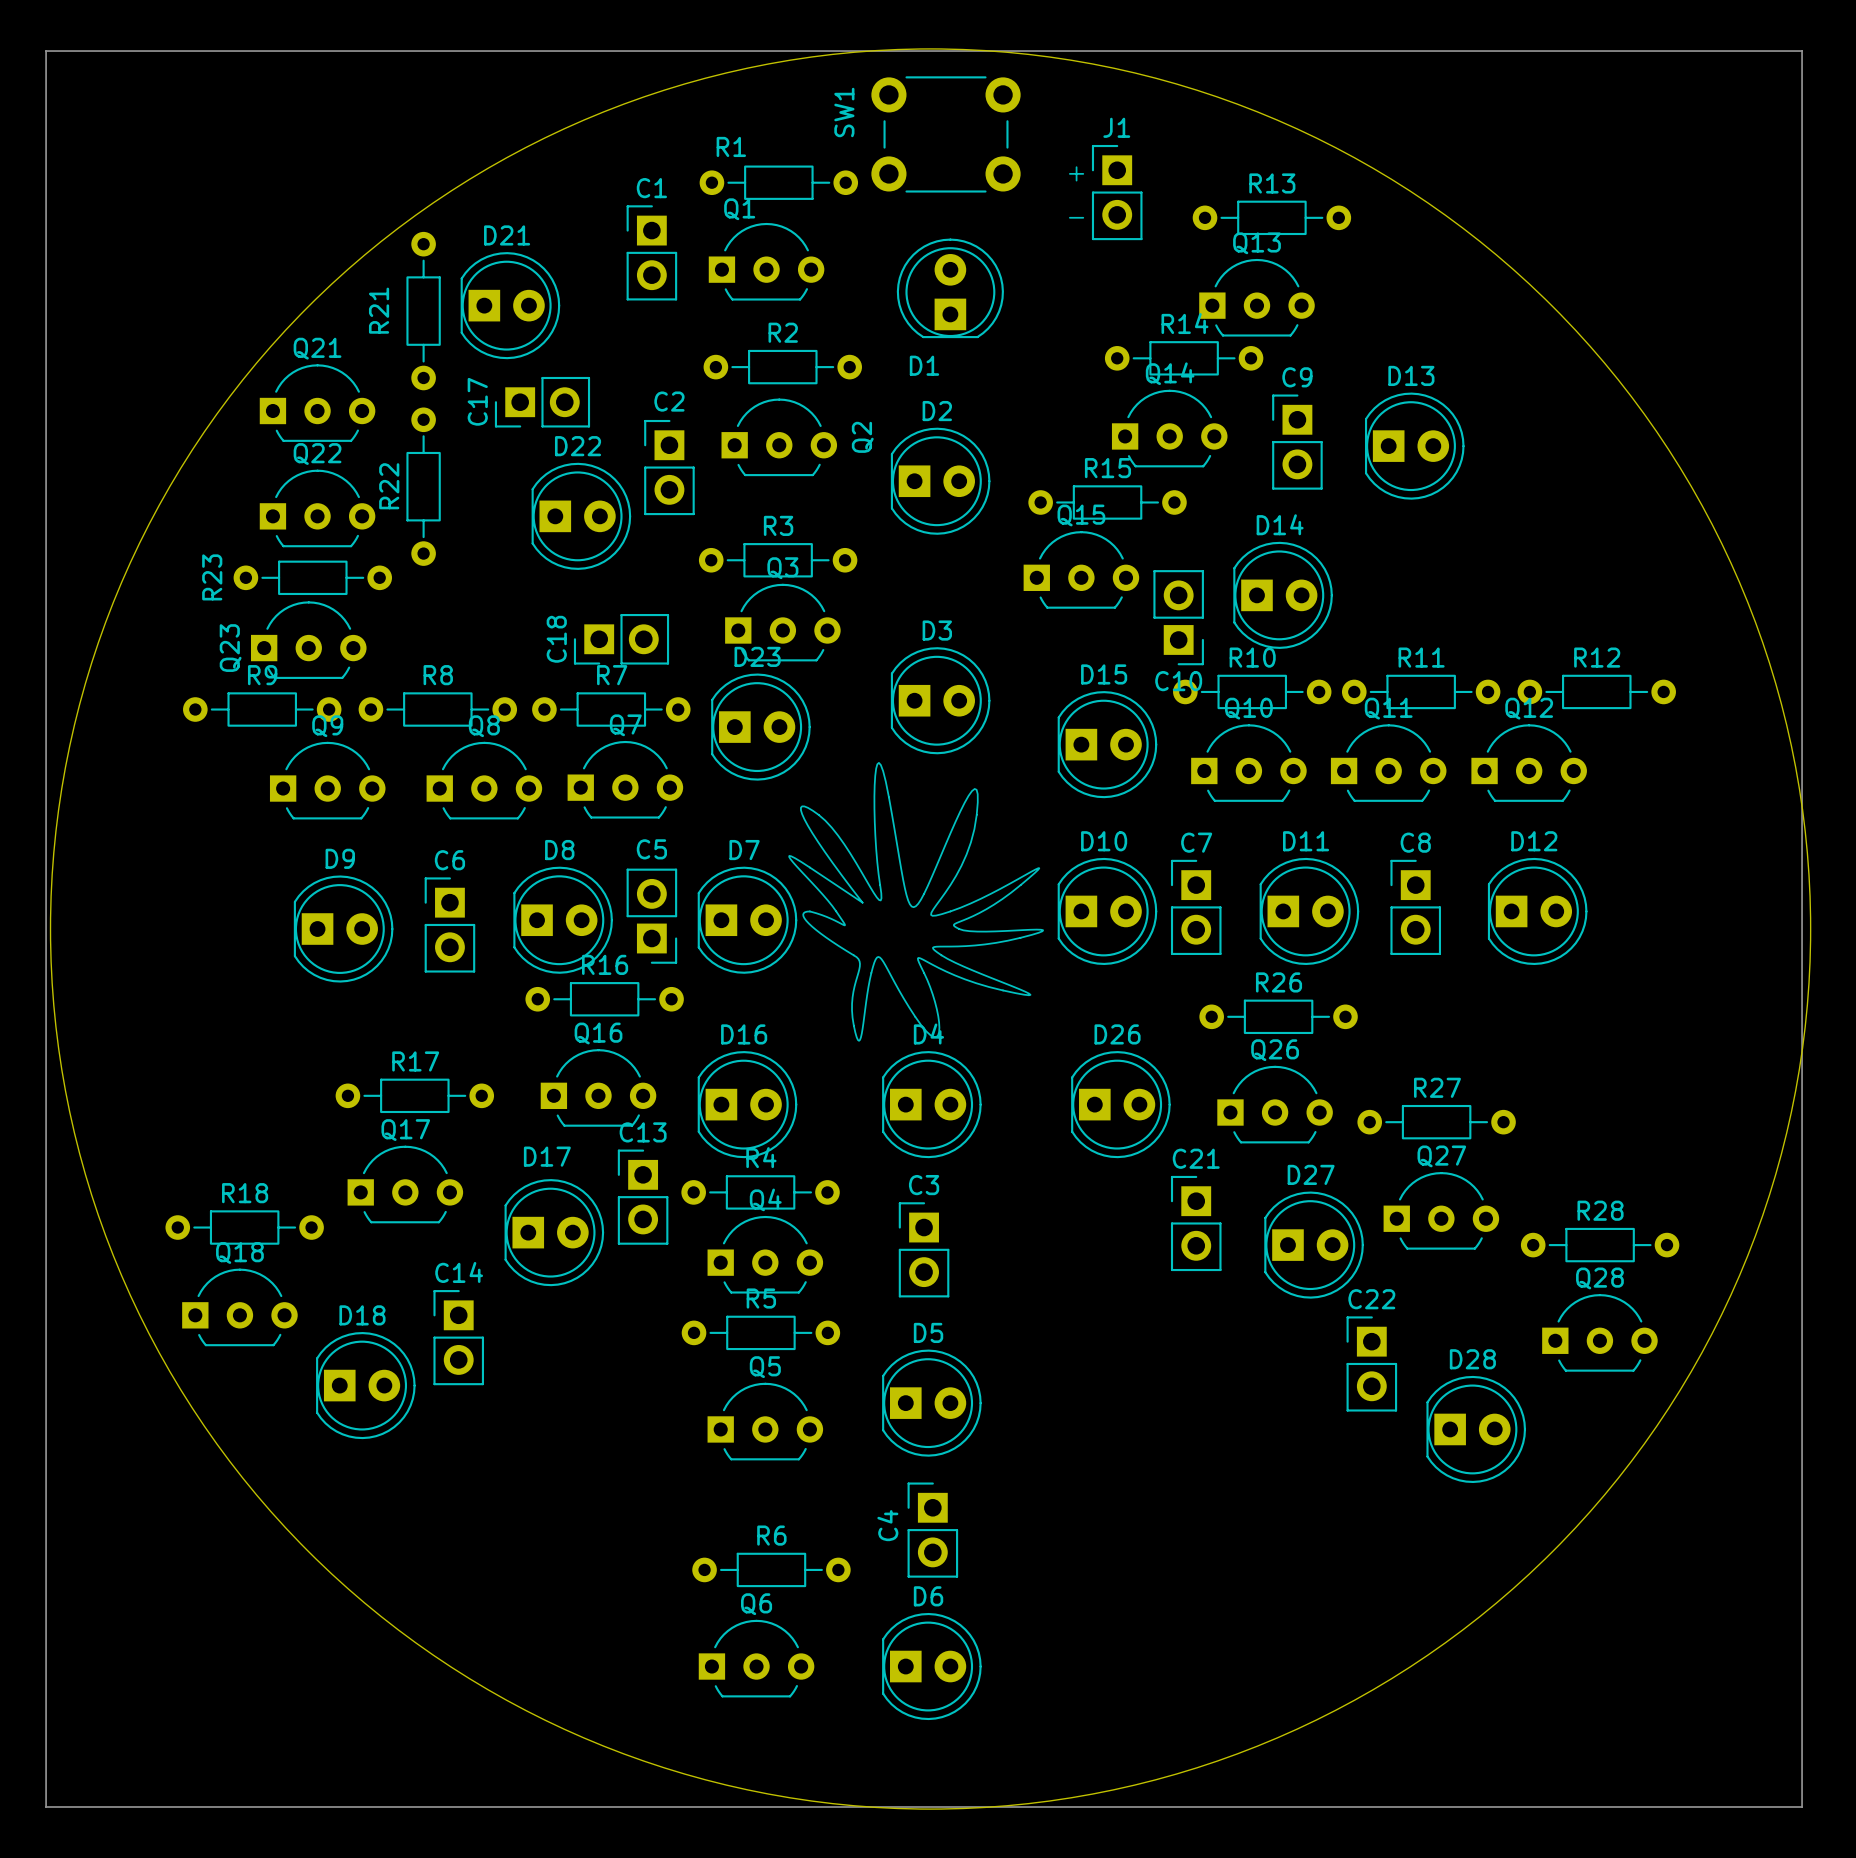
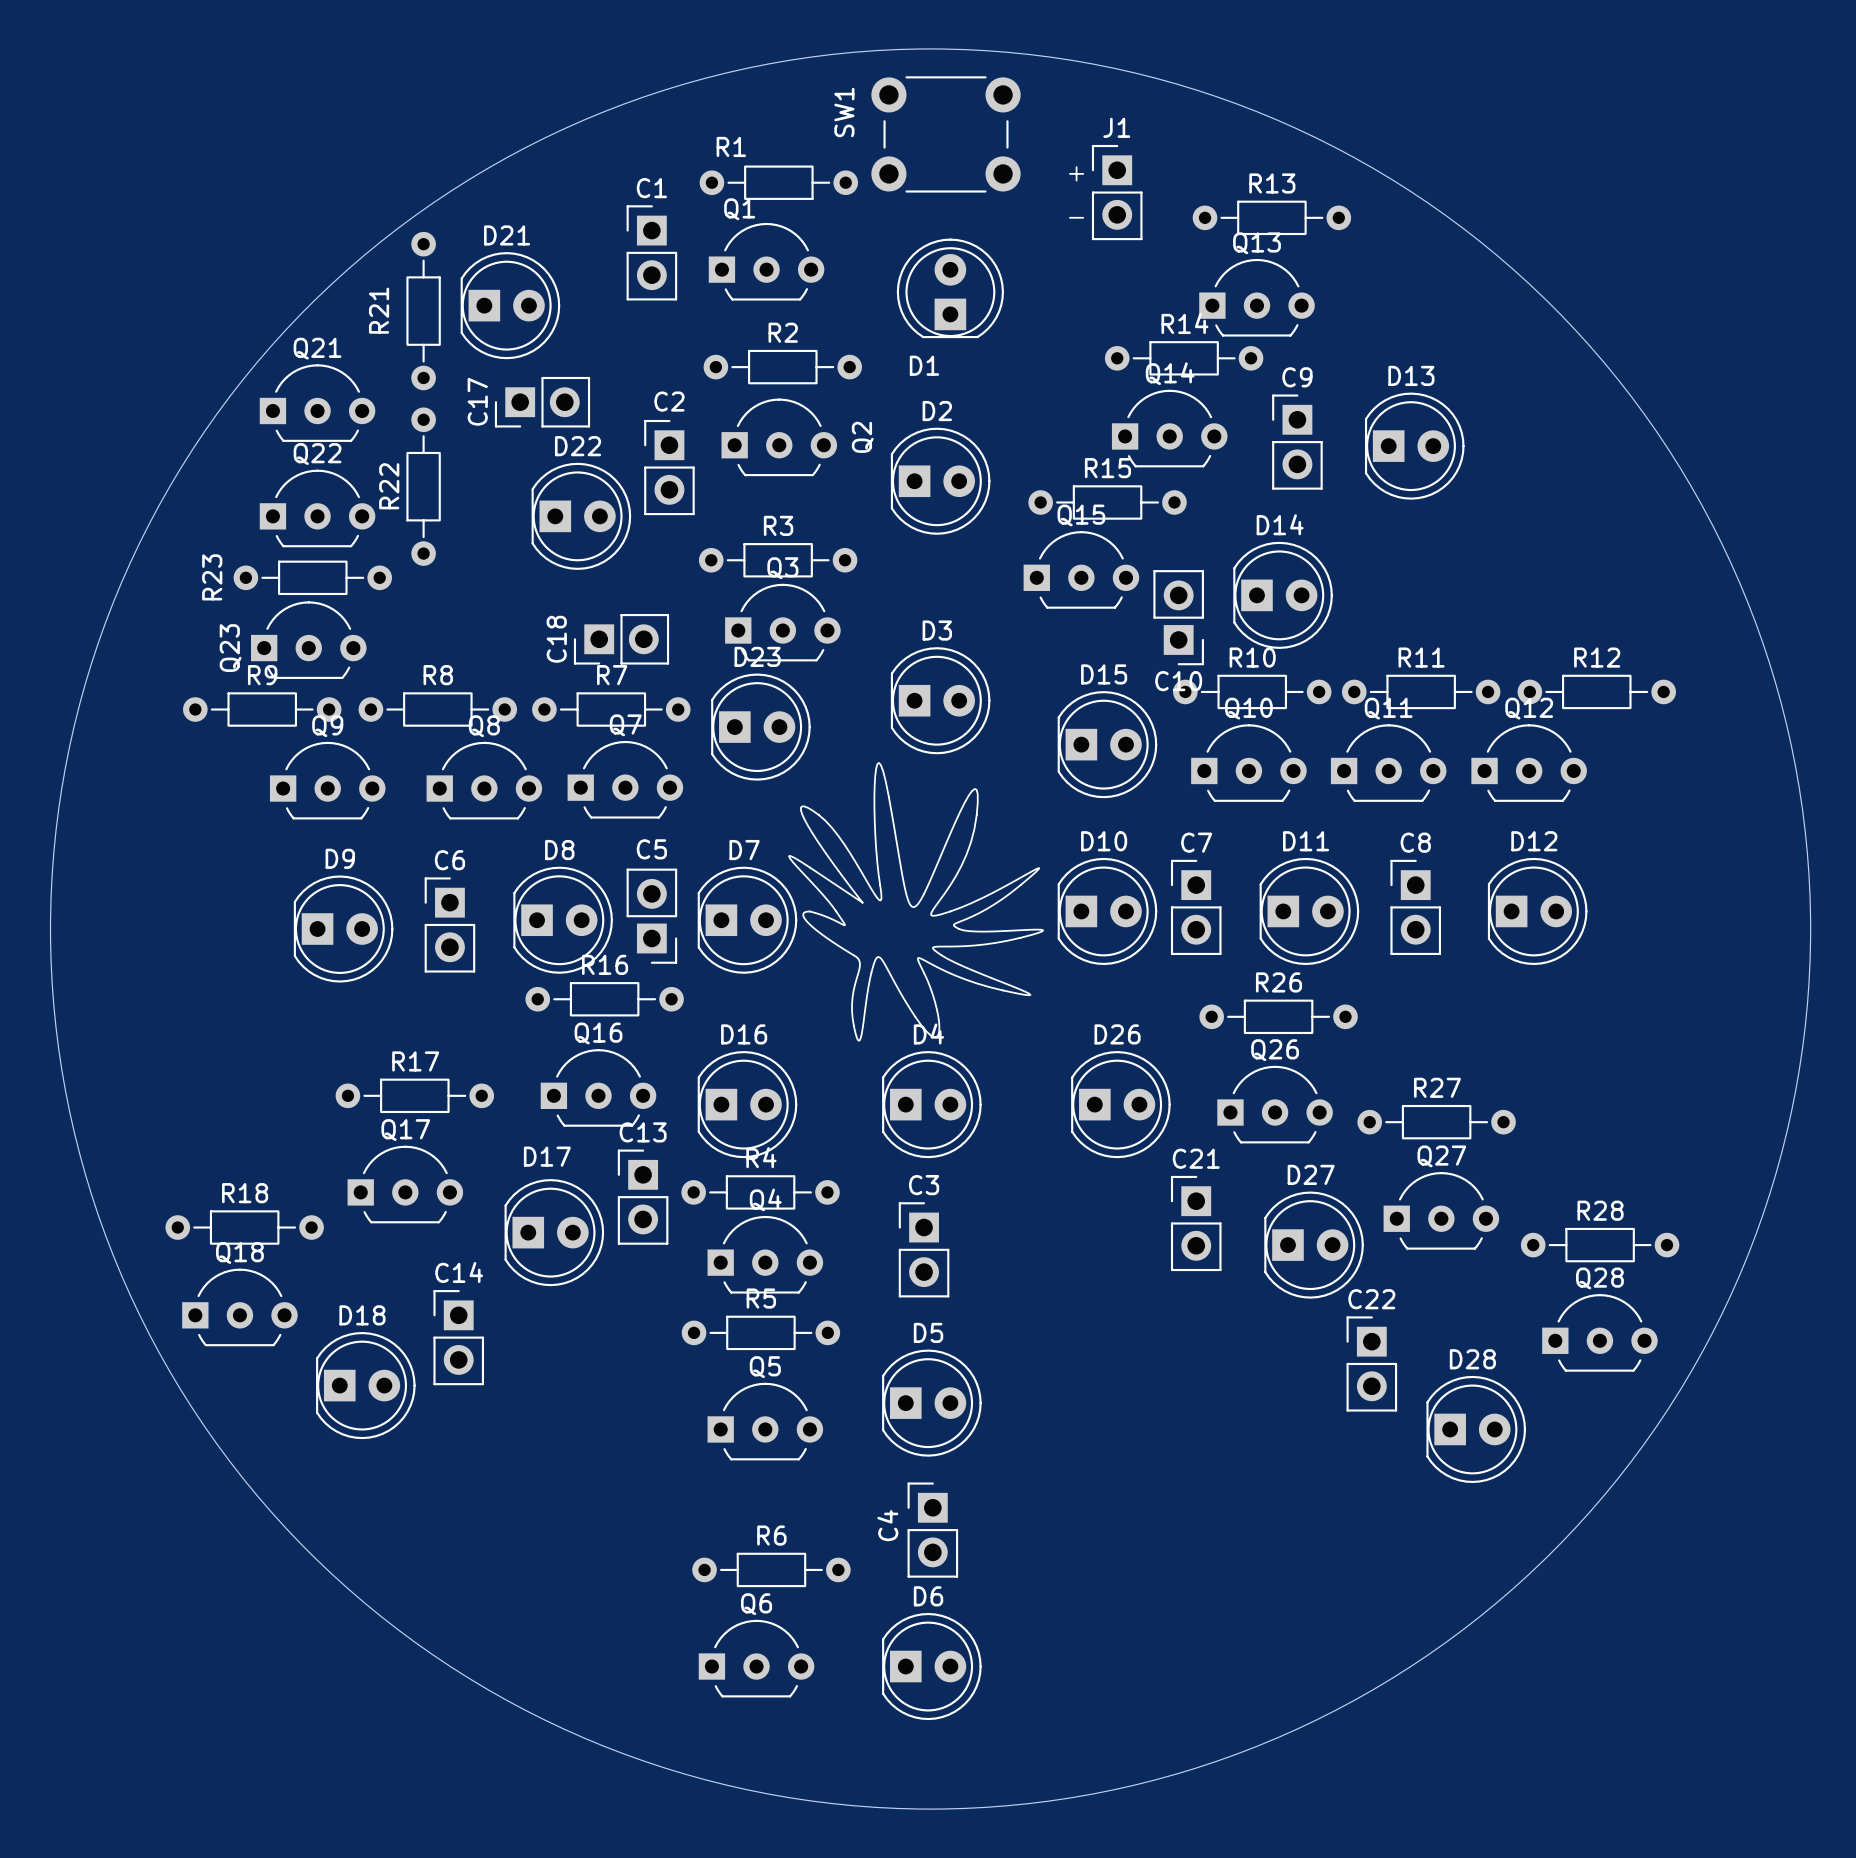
line: (46, 51) (1802, 51) (1802, 1807) (46, 1807) (46, 51) -> none

